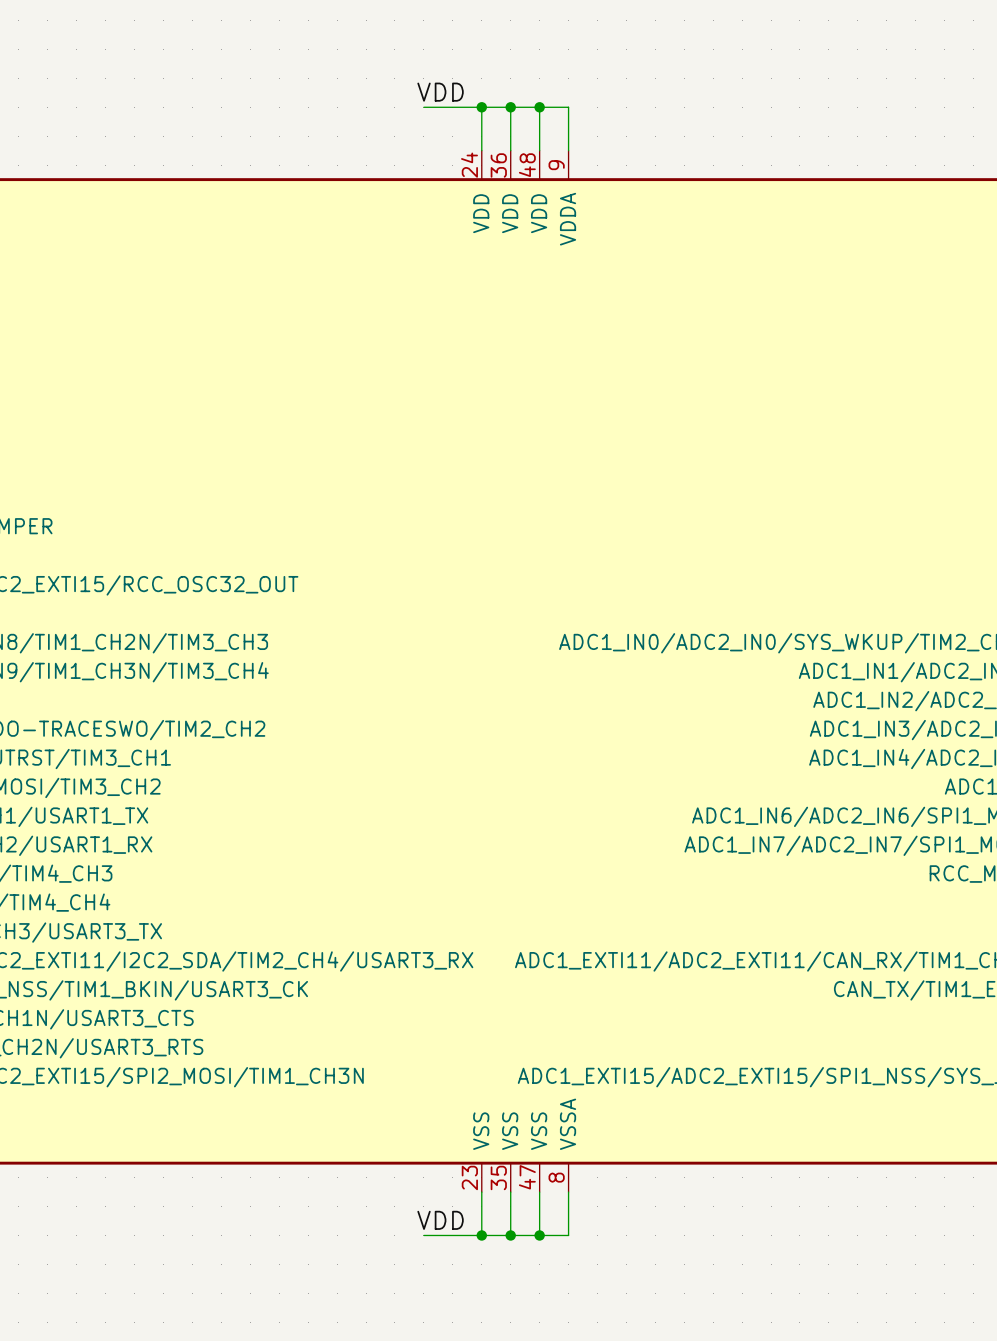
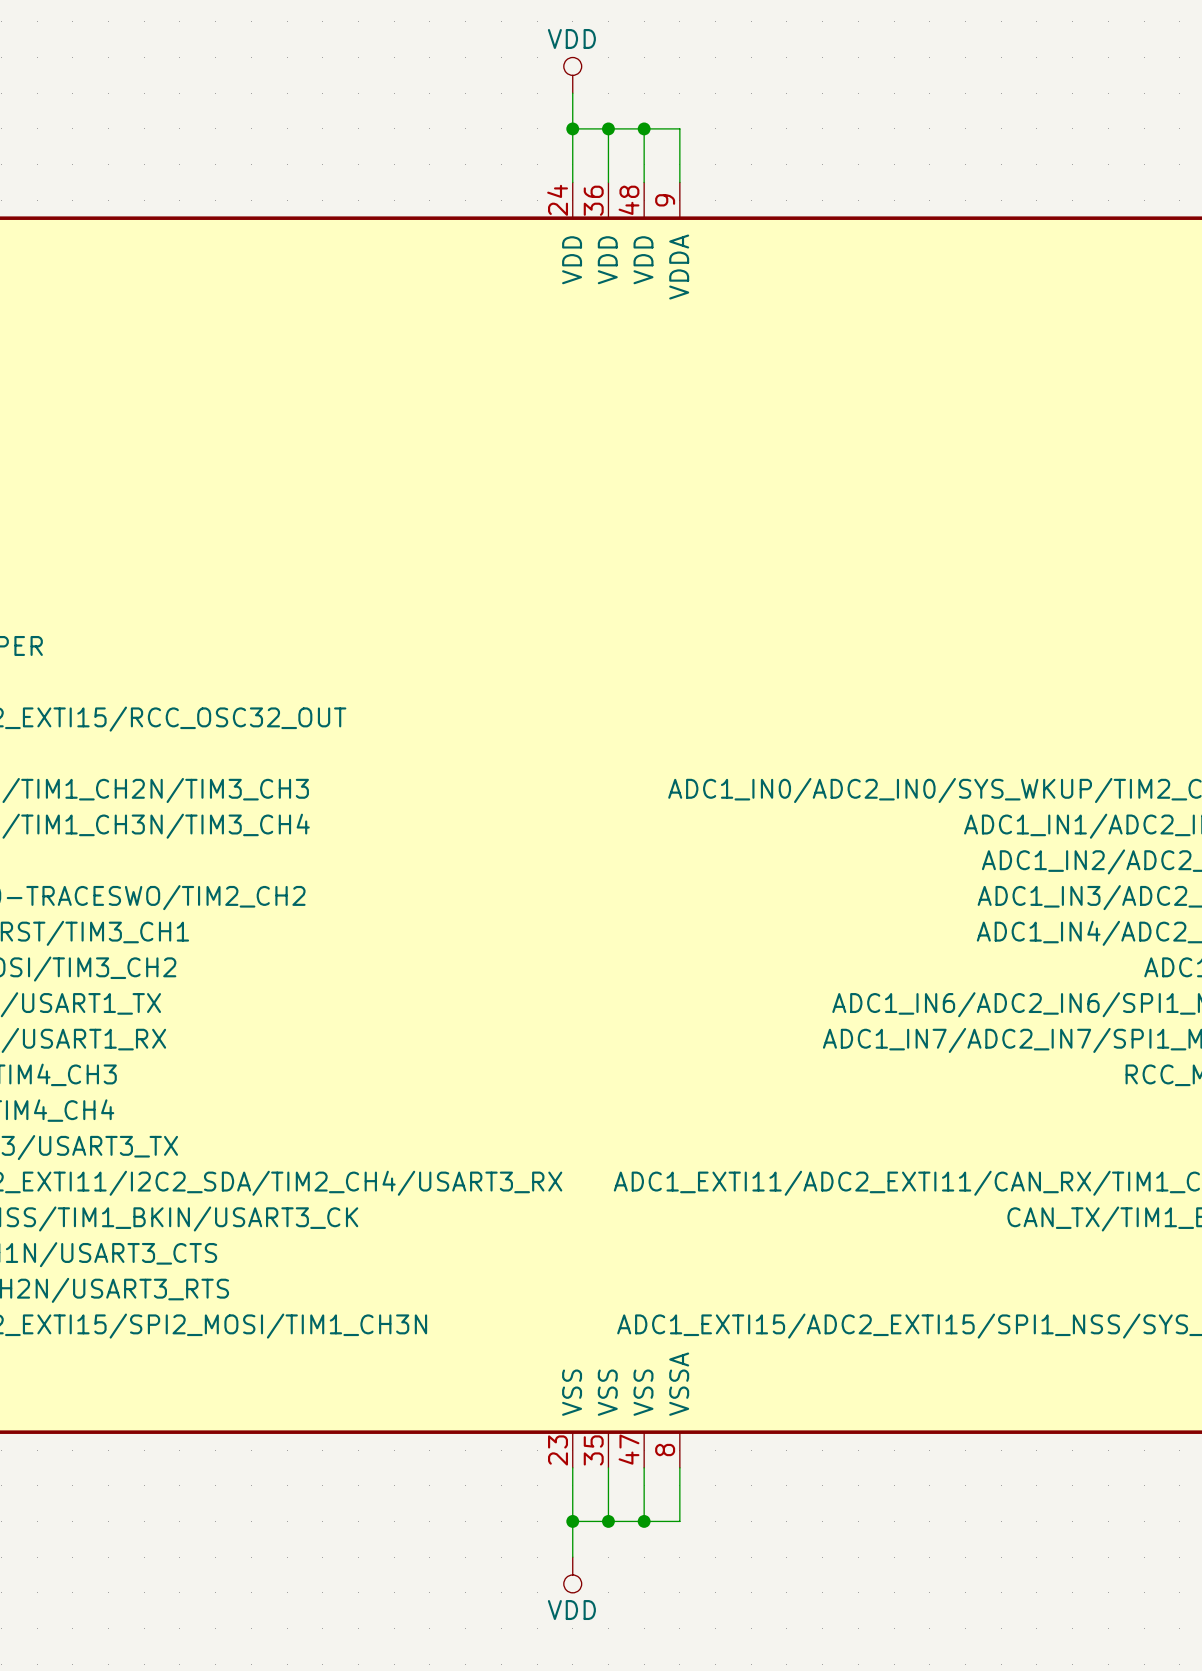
power symbol: none -> VDD (572, 75)
label: VDD (440, 92) -> none
wire: (423, 107) (481, 107) -> (572, 93) (572, 128)
label: VDD (440, 1220) -> none
wire: (423, 1235) (481, 1235) -> (572, 1557) (572, 1521)
power symbol: none -> VDD (572, 1574)

